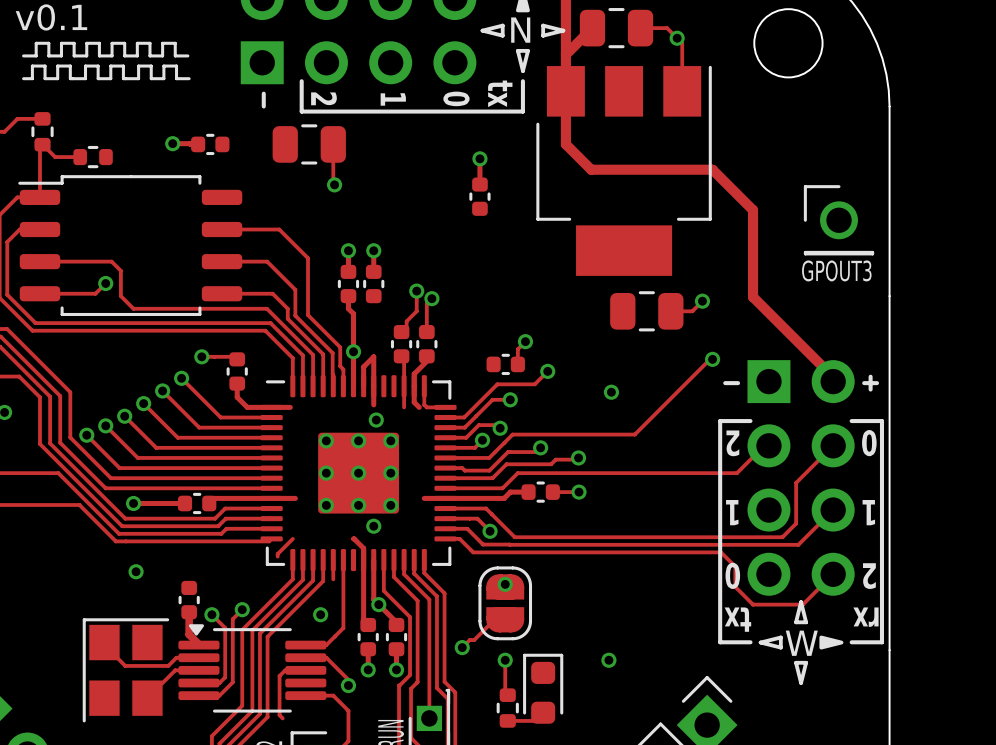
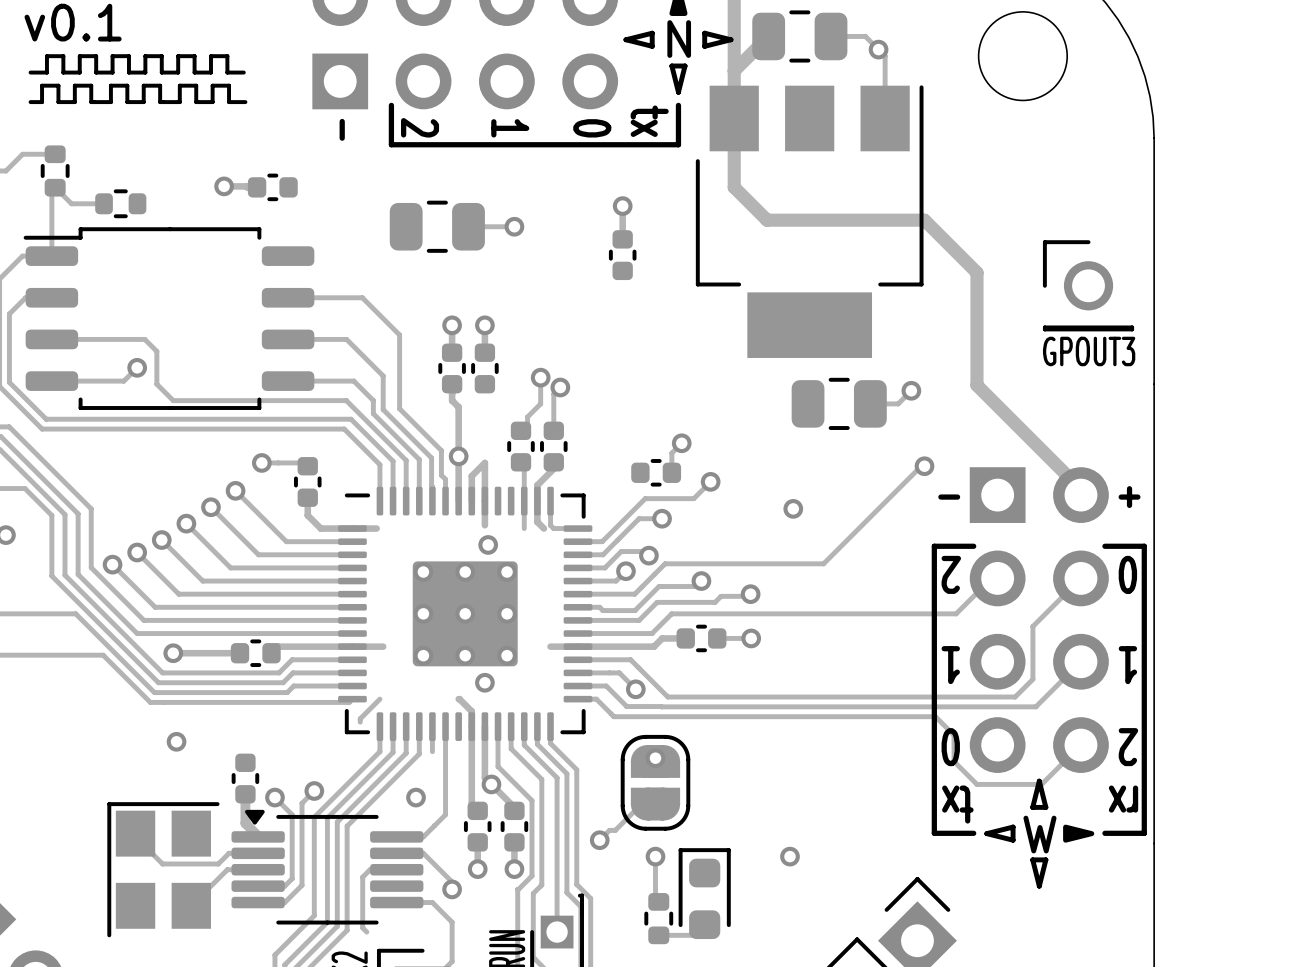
part position: (309, 144) -> (437, 226)
track: (333, 149) (334, 184) -> none
track: none -> (468, 226) (514, 226)
via position: (334, 184) -> (514, 226)

